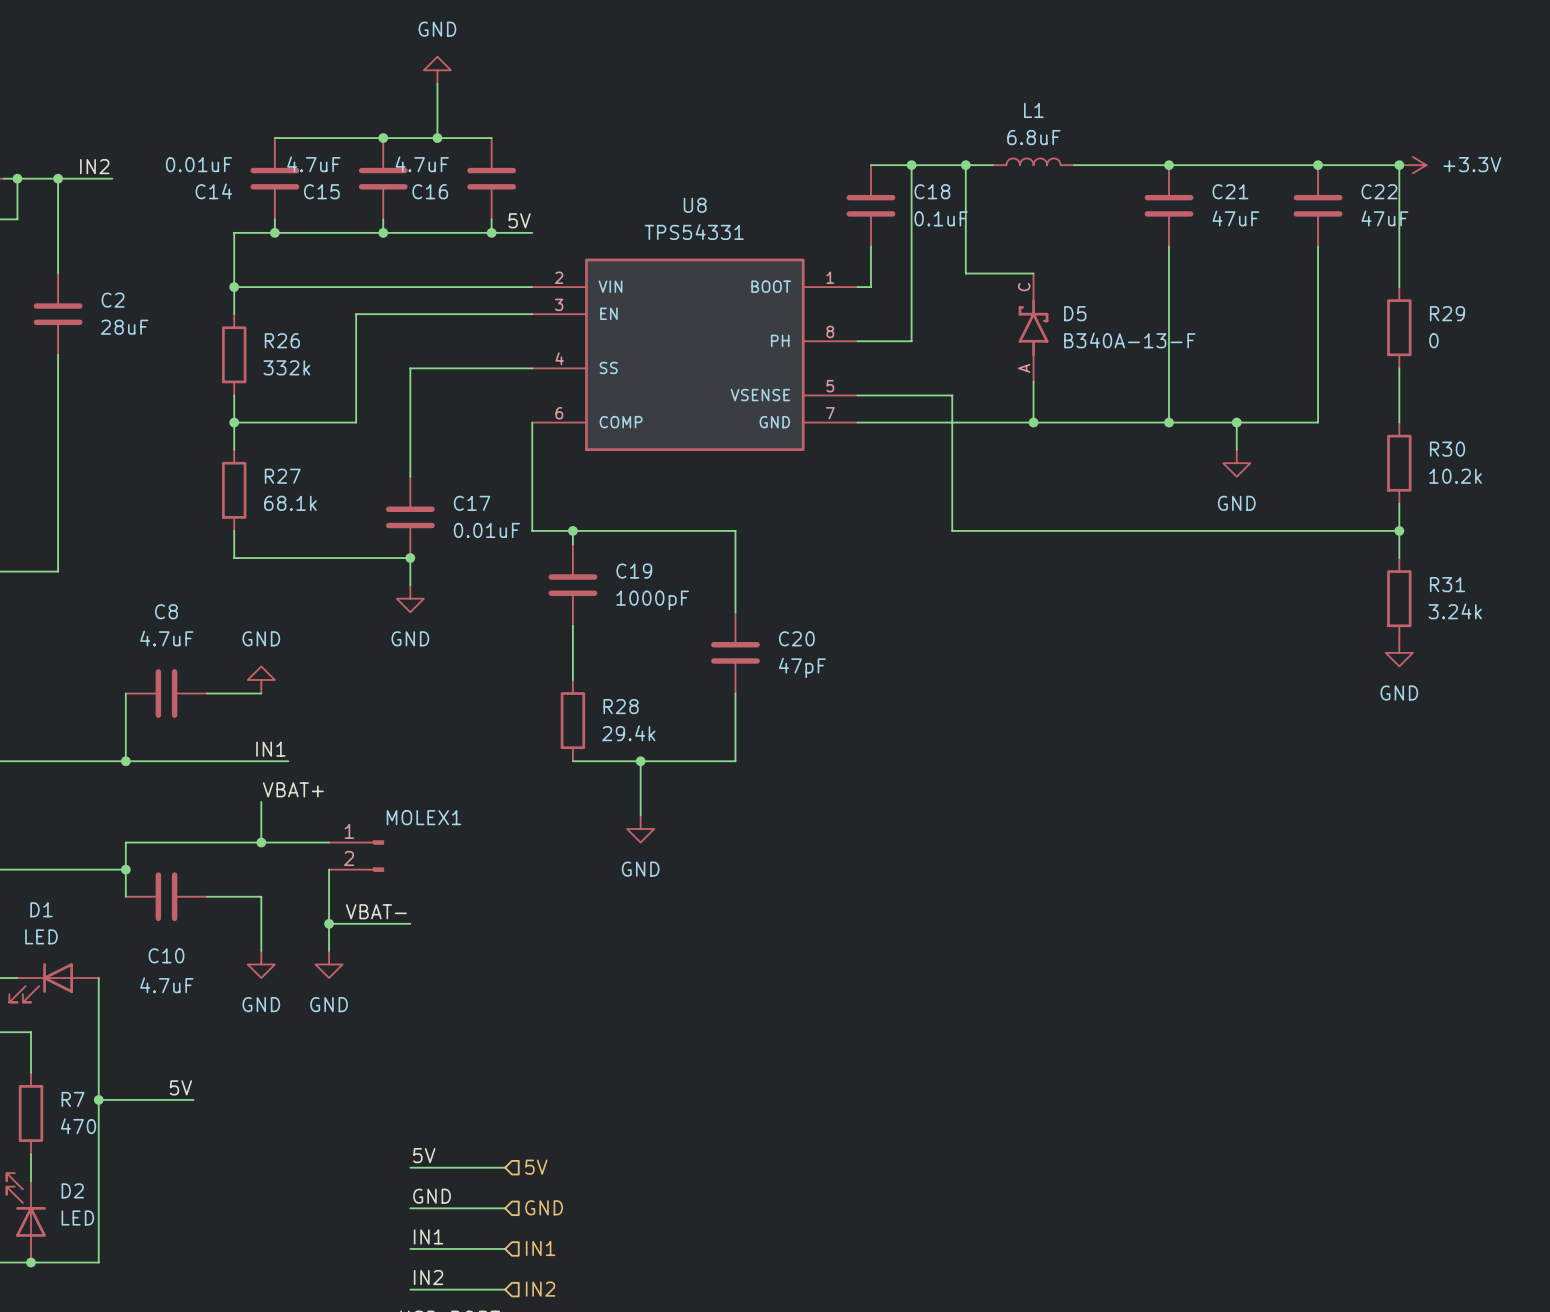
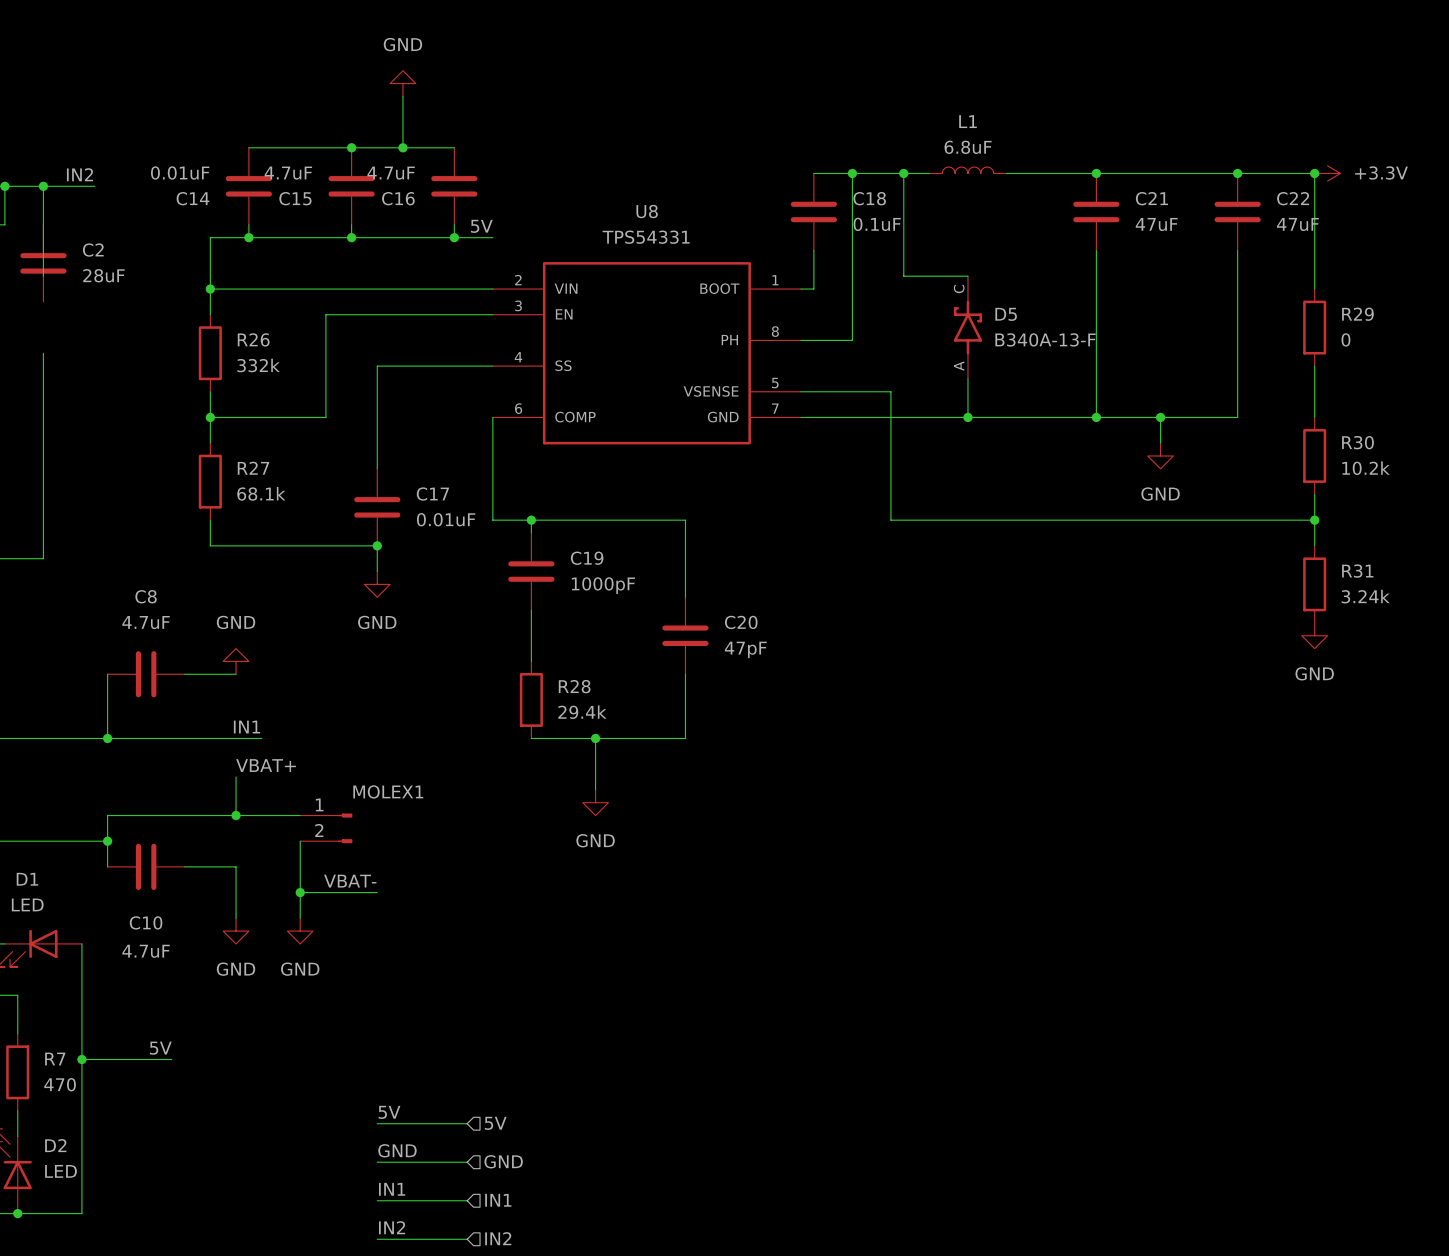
C2 position: (58, 314) -> (43, 263)

